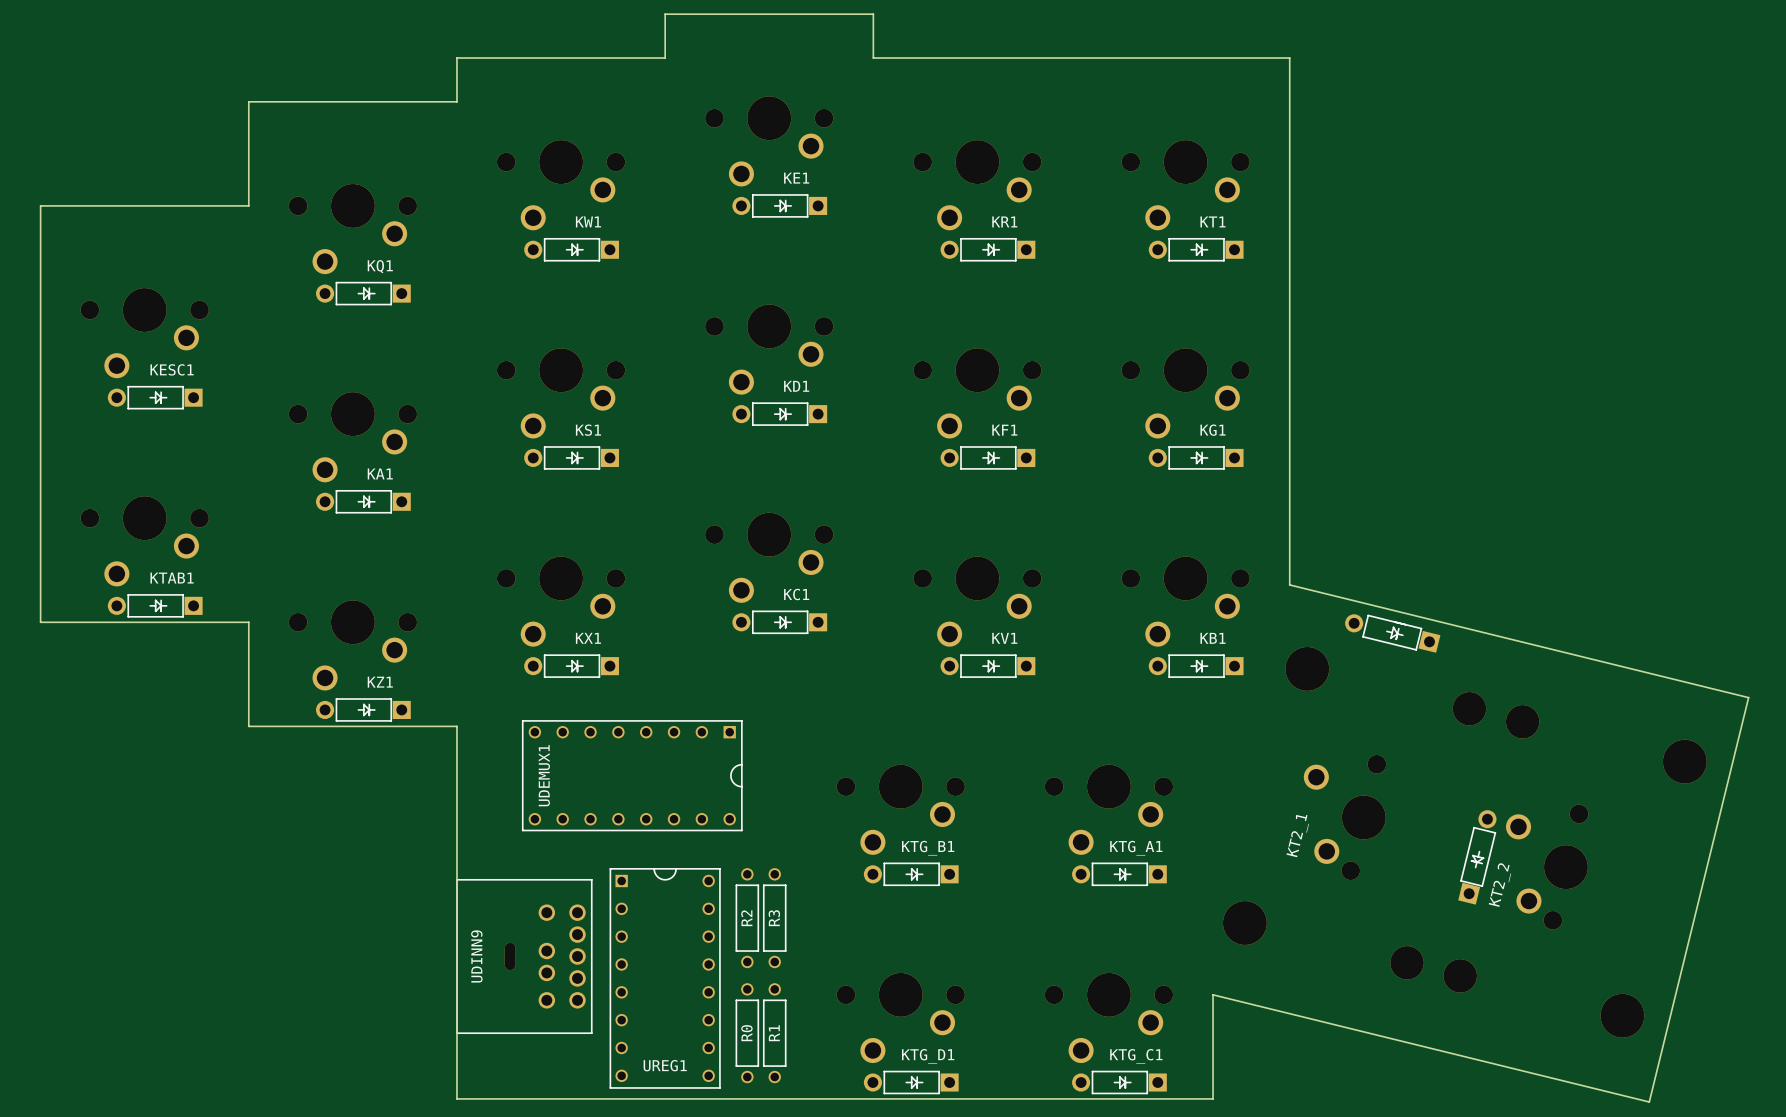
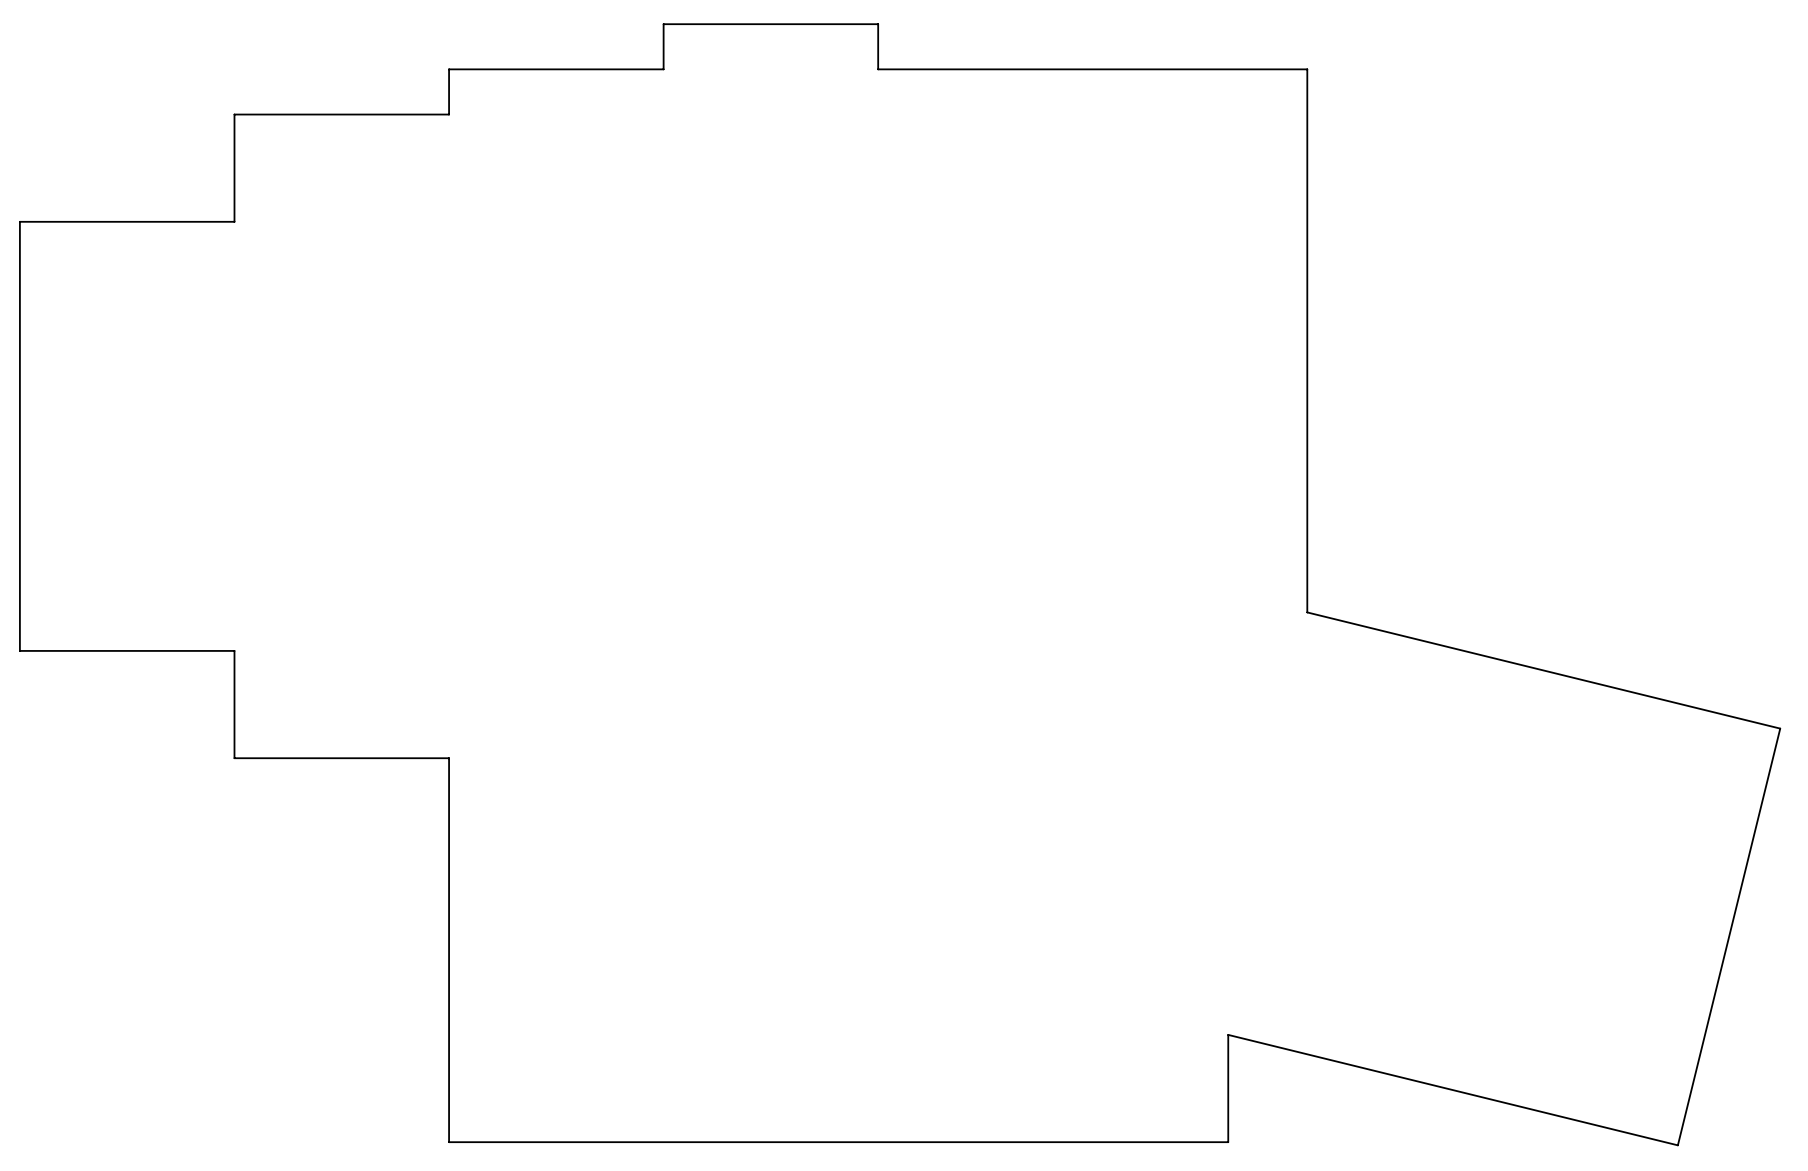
KE1: (769, 156) -> none
KW1: (561, 200) -> none
KR1: (977, 200) -> none
KT1: (1185, 200) -> none
KQ1: (352, 244) -> none
KESC1: (144, 348) -> none
KD1: (769, 365) -> none
KS1: (561, 408) -> none
KF1: (977, 408) -> none
KG1: (1185, 408) -> none
KA1: (352, 452) -> none
KTAB1: (144, 556) -> none
KC1: (769, 573) -> none
KX1: (561, 617) -> none
KV1: (977, 617) -> none
KB1: (1185, 617) -> none
KZ1: (352, 660) -> none
UDEMUX1: (632, 775) -> none
KT2_1: (1354, 796) -> none
KTG_B1: (900, 825) -> none
KTG_A1: (1108, 825) -> none
KT2_2: (1575, 871) -> none
R2: (747, 918) -> none
R3: (774, 918) -> none
UDINN9: (524, 956) -> none
UREG1: (665, 978) -> none
R0: (747, 1033) -> none
R1: (774, 1033) -> none
KTG_D1: (900, 1033) -> none
KTG_C1: (1108, 1033) -> none

